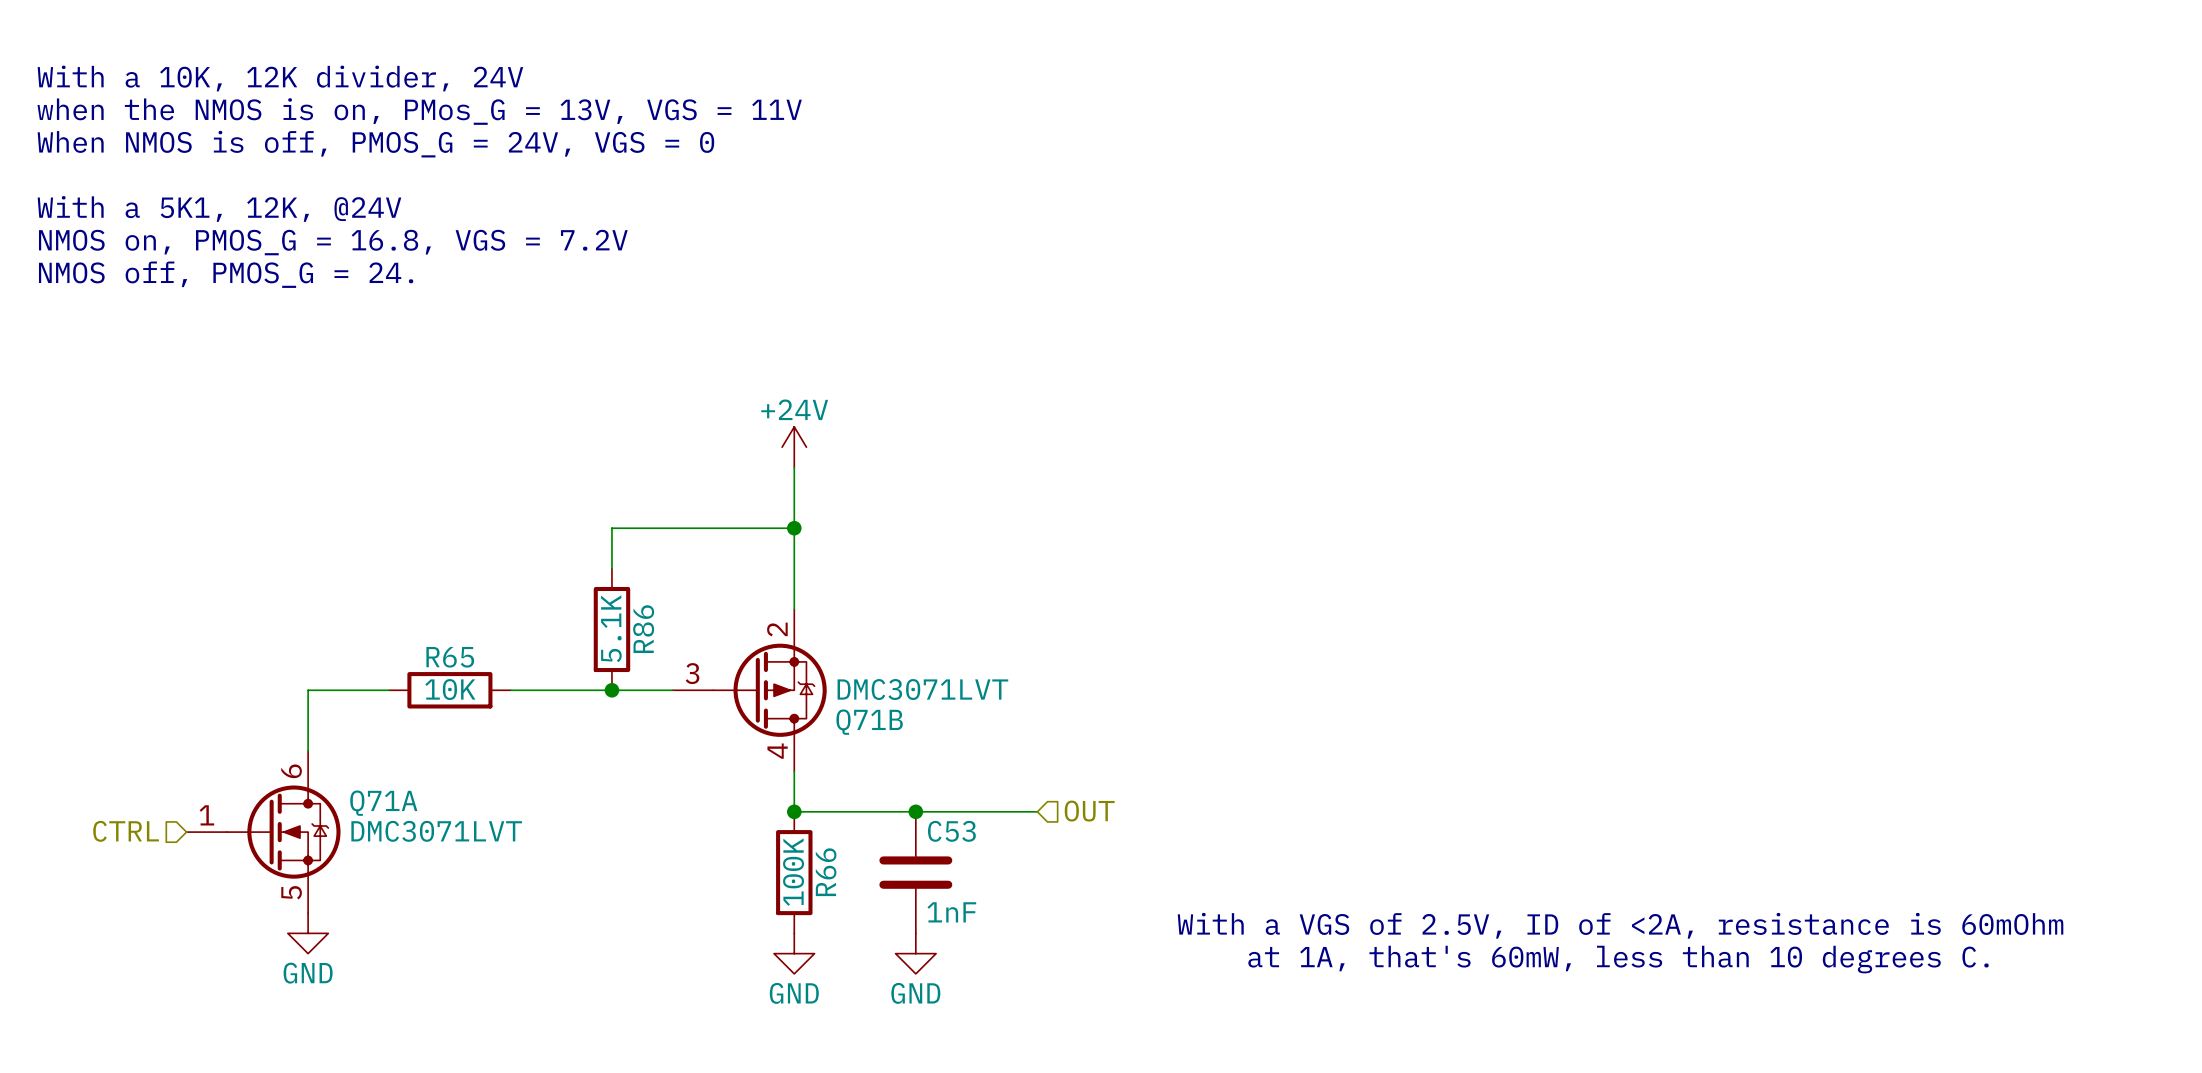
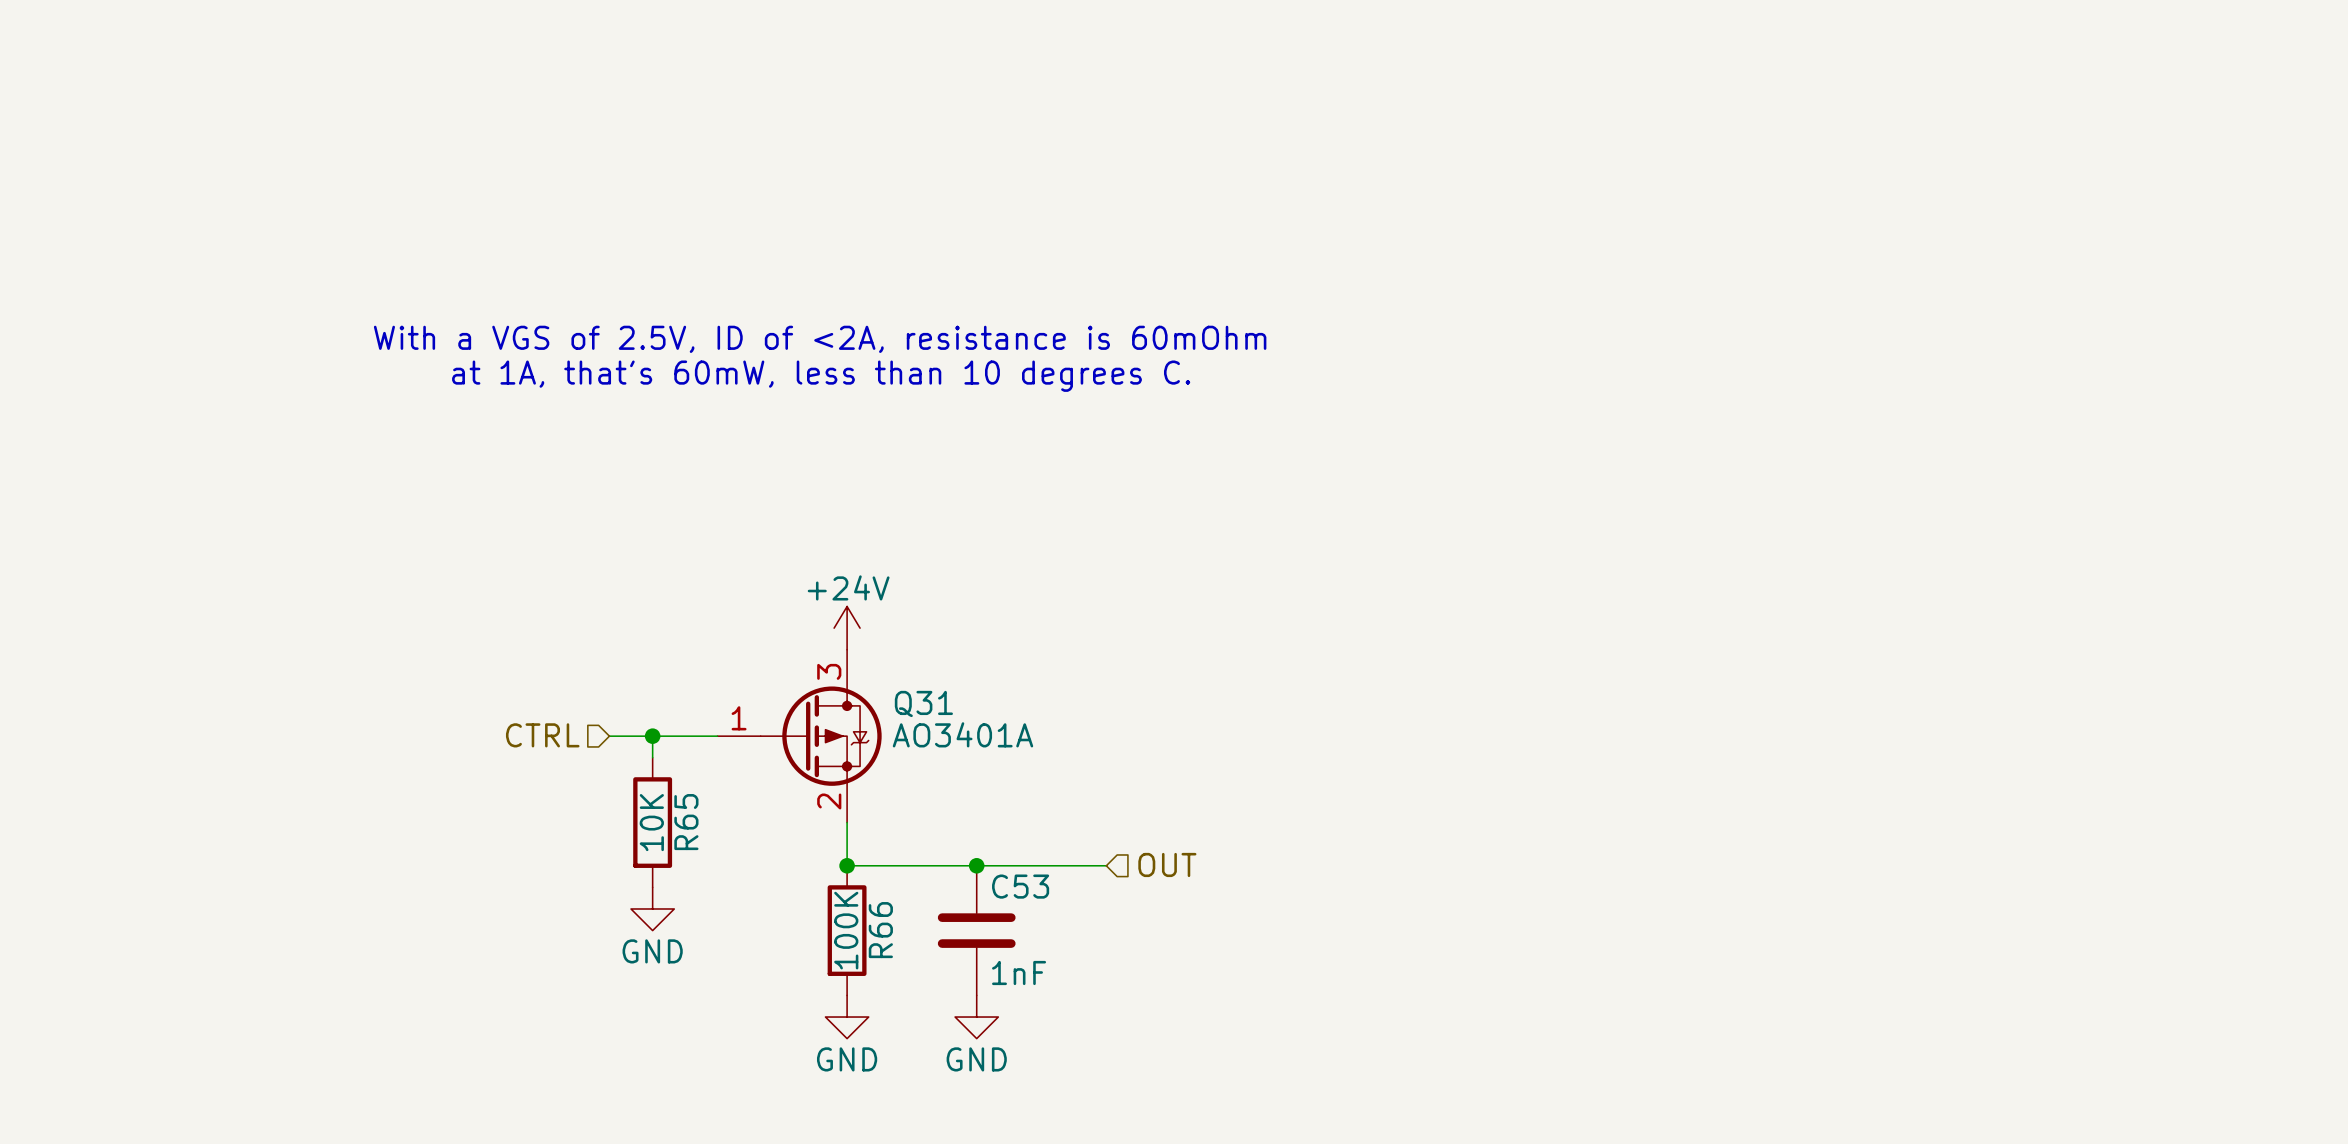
text: With a 10K, 12K divider, 24V (280, 78) -> none
text: when the NMOS is on, PMos_G = 13V, VGS = 11V (419, 111) -> none
text: When NMOS is off, PMOS_G = 24V, VGS = 0 (375, 144) -> none
text: With a 5K1, 12K, @24V (219, 208) -> none
text: NMOS on, PMOS_G = 16.8, VGS = 7.2V (333, 242) -> none
text: NMOS off, PMOS_G = 24. (226, 274) -> none
text: none -> With a VGS of 2.5V, ID of <2A, resistance is 60mOhm (820, 339)
text: none -> at 1A, that's 60mW, less than 10 degrees C. (821, 376)
power symbol position: +24V (794, 447) -> +24V (847, 628)
wire: (794, 467) (794, 609) -> none
wire: (794, 528) (611, 528) (611, 568) -> none
junction: (794, 528) -> none
R86: 5.1K (611, 629) -> none
hierarchical label: none -> CTRL (542, 735)
wire: (389, 690) (308, 690) (308, 751) -> none
R65 rotation: 0° (449, 690) -> 90° clockwise (652, 822)
R65 position: (449, 690) -> (652, 822)
wire: (510, 690) (571, 690) -> none
wire: none -> (652, 736) (652, 757)
Q71B: DMC3071LVT (749, 690) -> none
Q31: none -> AO3401A (799, 736)
hierarchical label: CTRL (126, 831) -> none
Q71A: DMC3071LVT (263, 832) -> none
text: With a VGS of 2.5V, ID of <2A, resistance is 60mOhm (1620, 925) -> none
power symbol position: GND (308, 933) -> GND (652, 908)
text: at 1A, that's 60mW, less than 10 degrees C. (1618, 959) -> none

